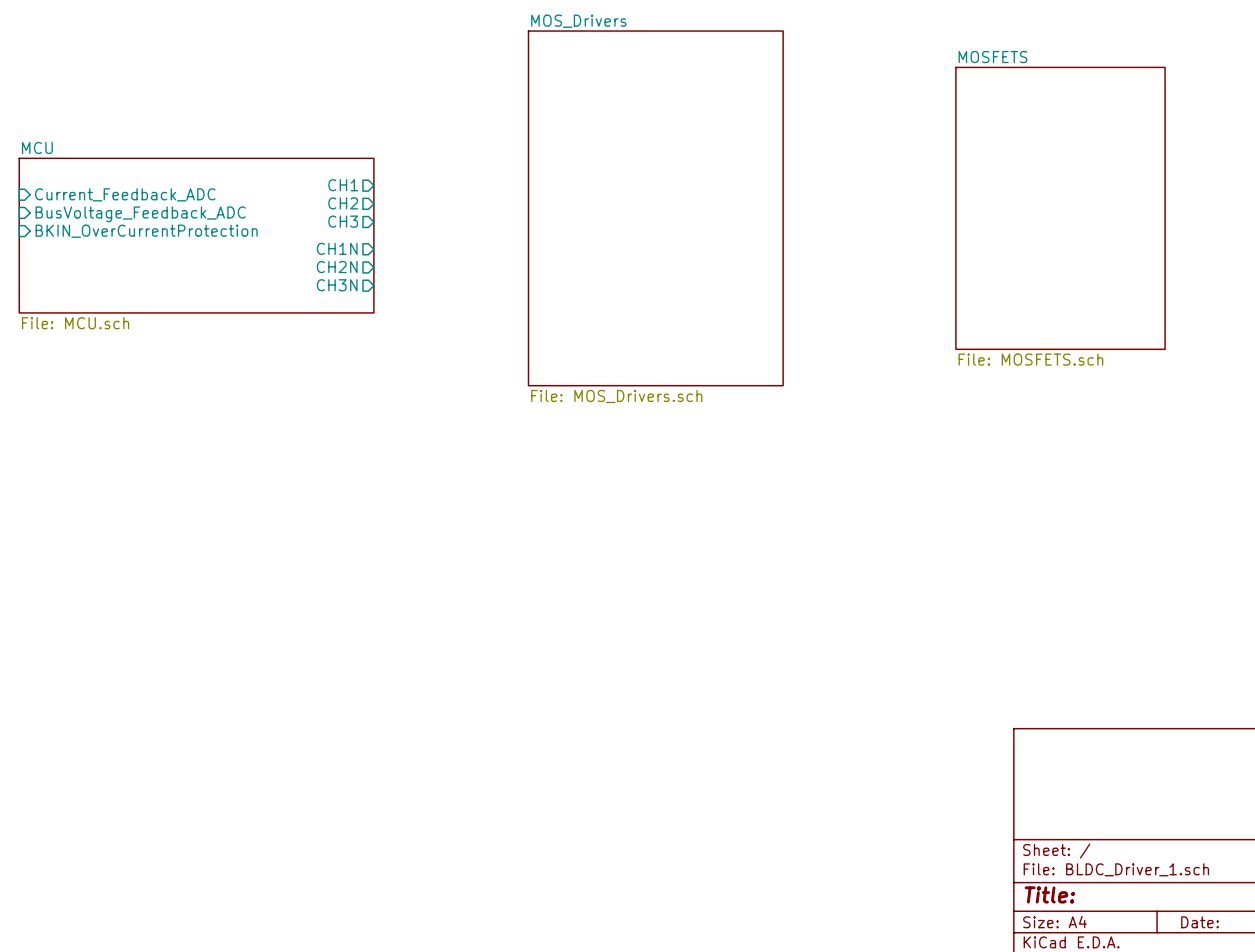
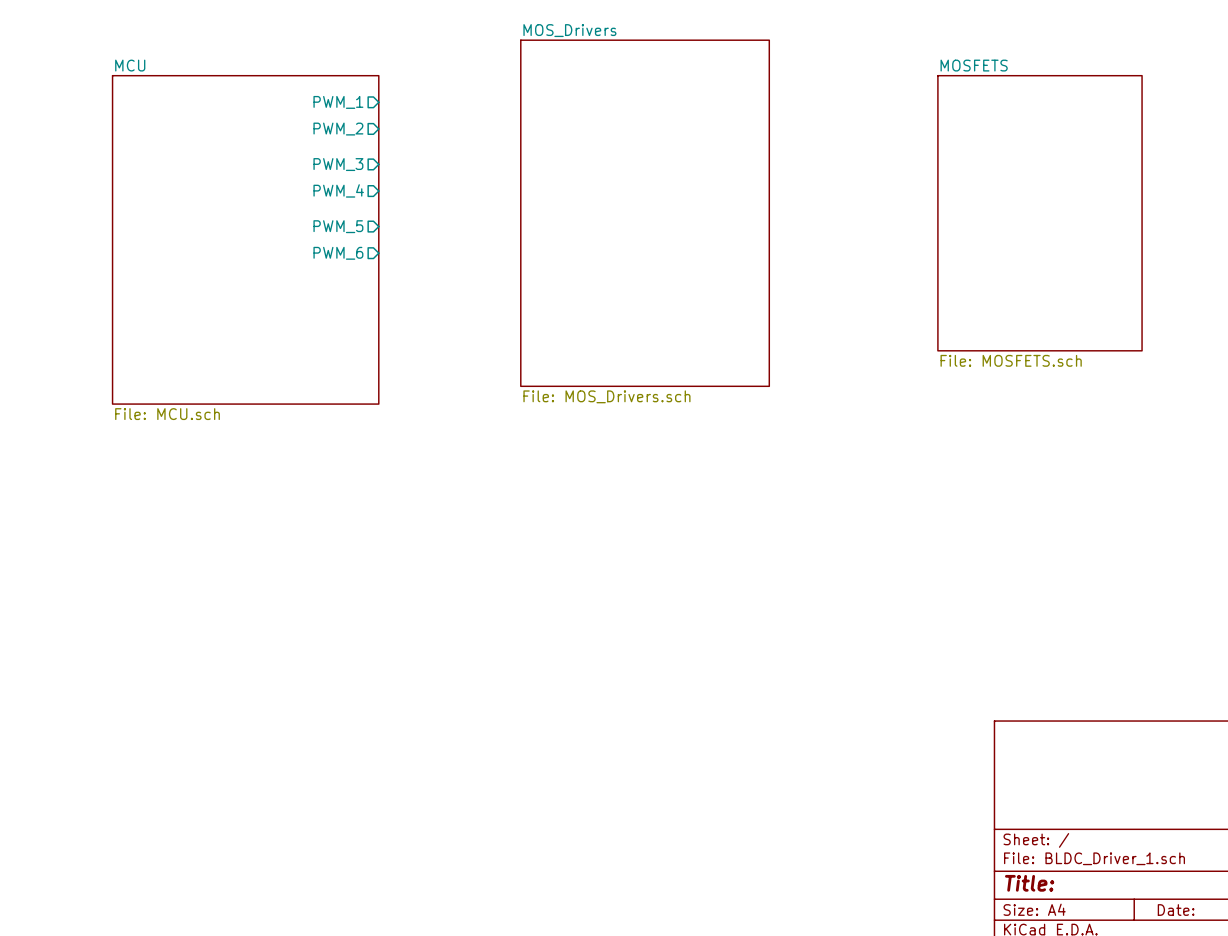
sheet pin: none -> PWM_1 (338, 102)
sheet pin: none -> PWM_2 (338, 129)
sheet pin: none -> PWM_3 (338, 164)
sheet pin: none -> PWM_4 (338, 190)
sheet pin: CH1 (343, 185) -> none
sheet pin: Current_Feedback_ADC (125, 194) -> none
sheet pin: CH2 (343, 203) -> none
sheet pin: BusVoltage_Feedback_ADC (140, 214) -> none
sheet pin: CH3 (343, 221) -> none
sheet pin: none -> PWM_5 (338, 226)
sheet pin: BKIN_OverCurrentProtection (146, 231) -> none
sheet MCU: File: MCU.sch (196, 235) -> none
sheet MCU: none -> File: MCU.sch (245, 239)
sheet pin: CH1N (337, 248) -> none
sheet pin: none -> PWM_6 (338, 253)
sheet pin: CH2N (337, 267) -> none
sheet pin: CH3N (337, 285) -> none

